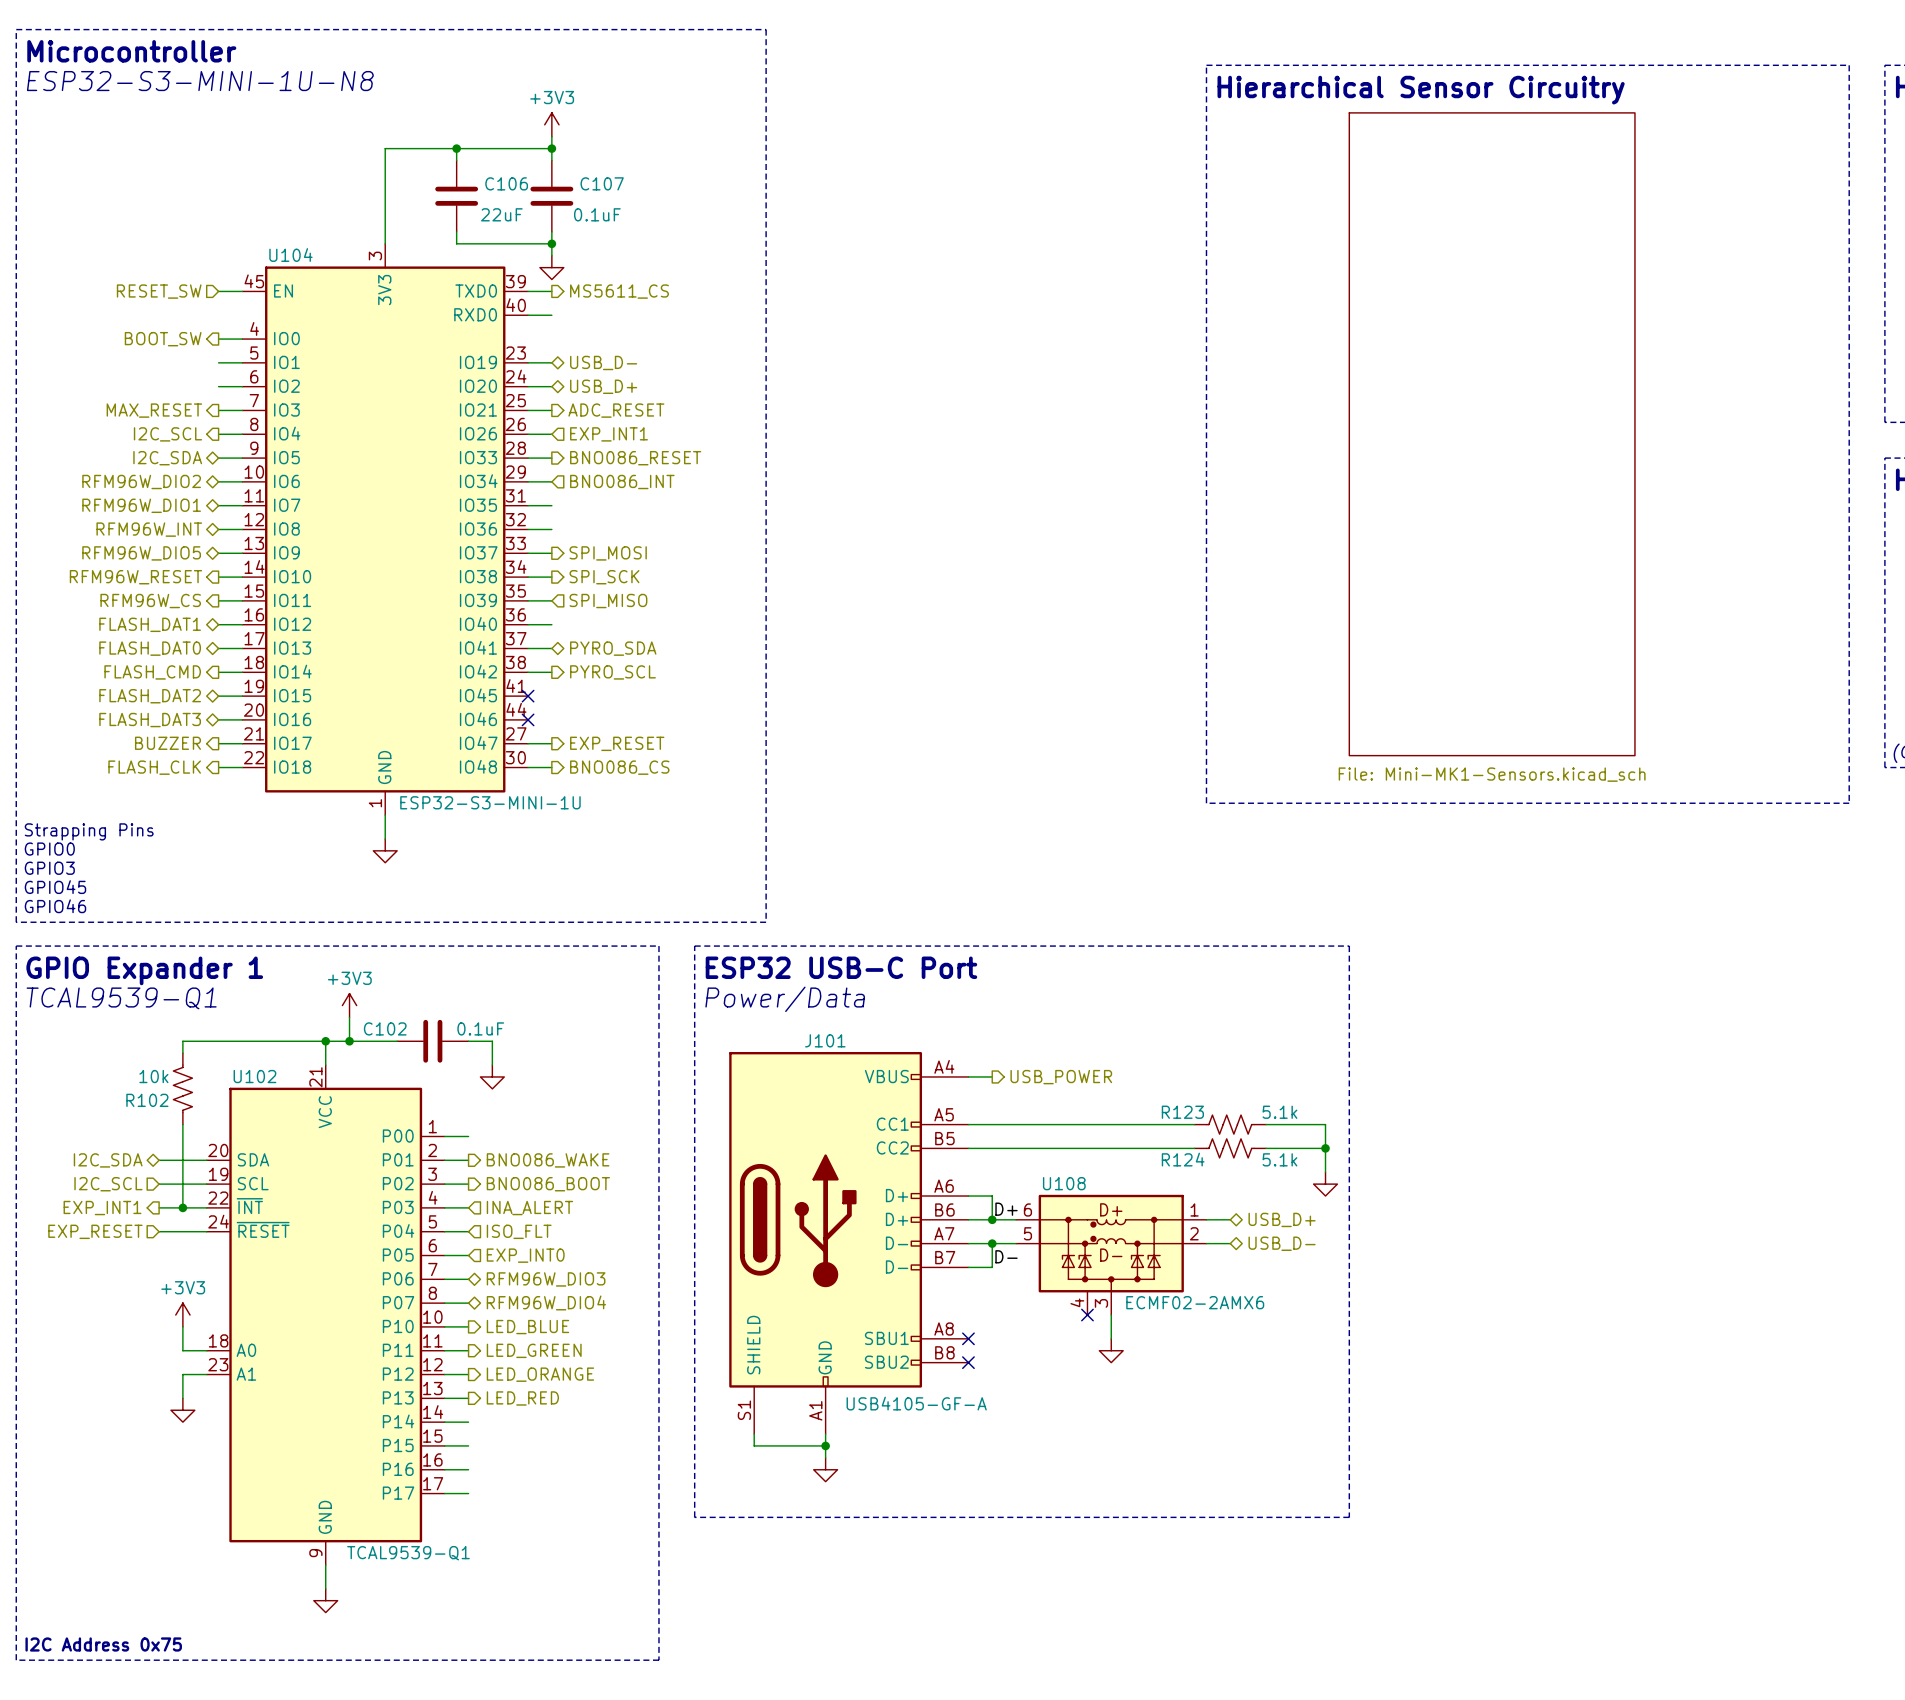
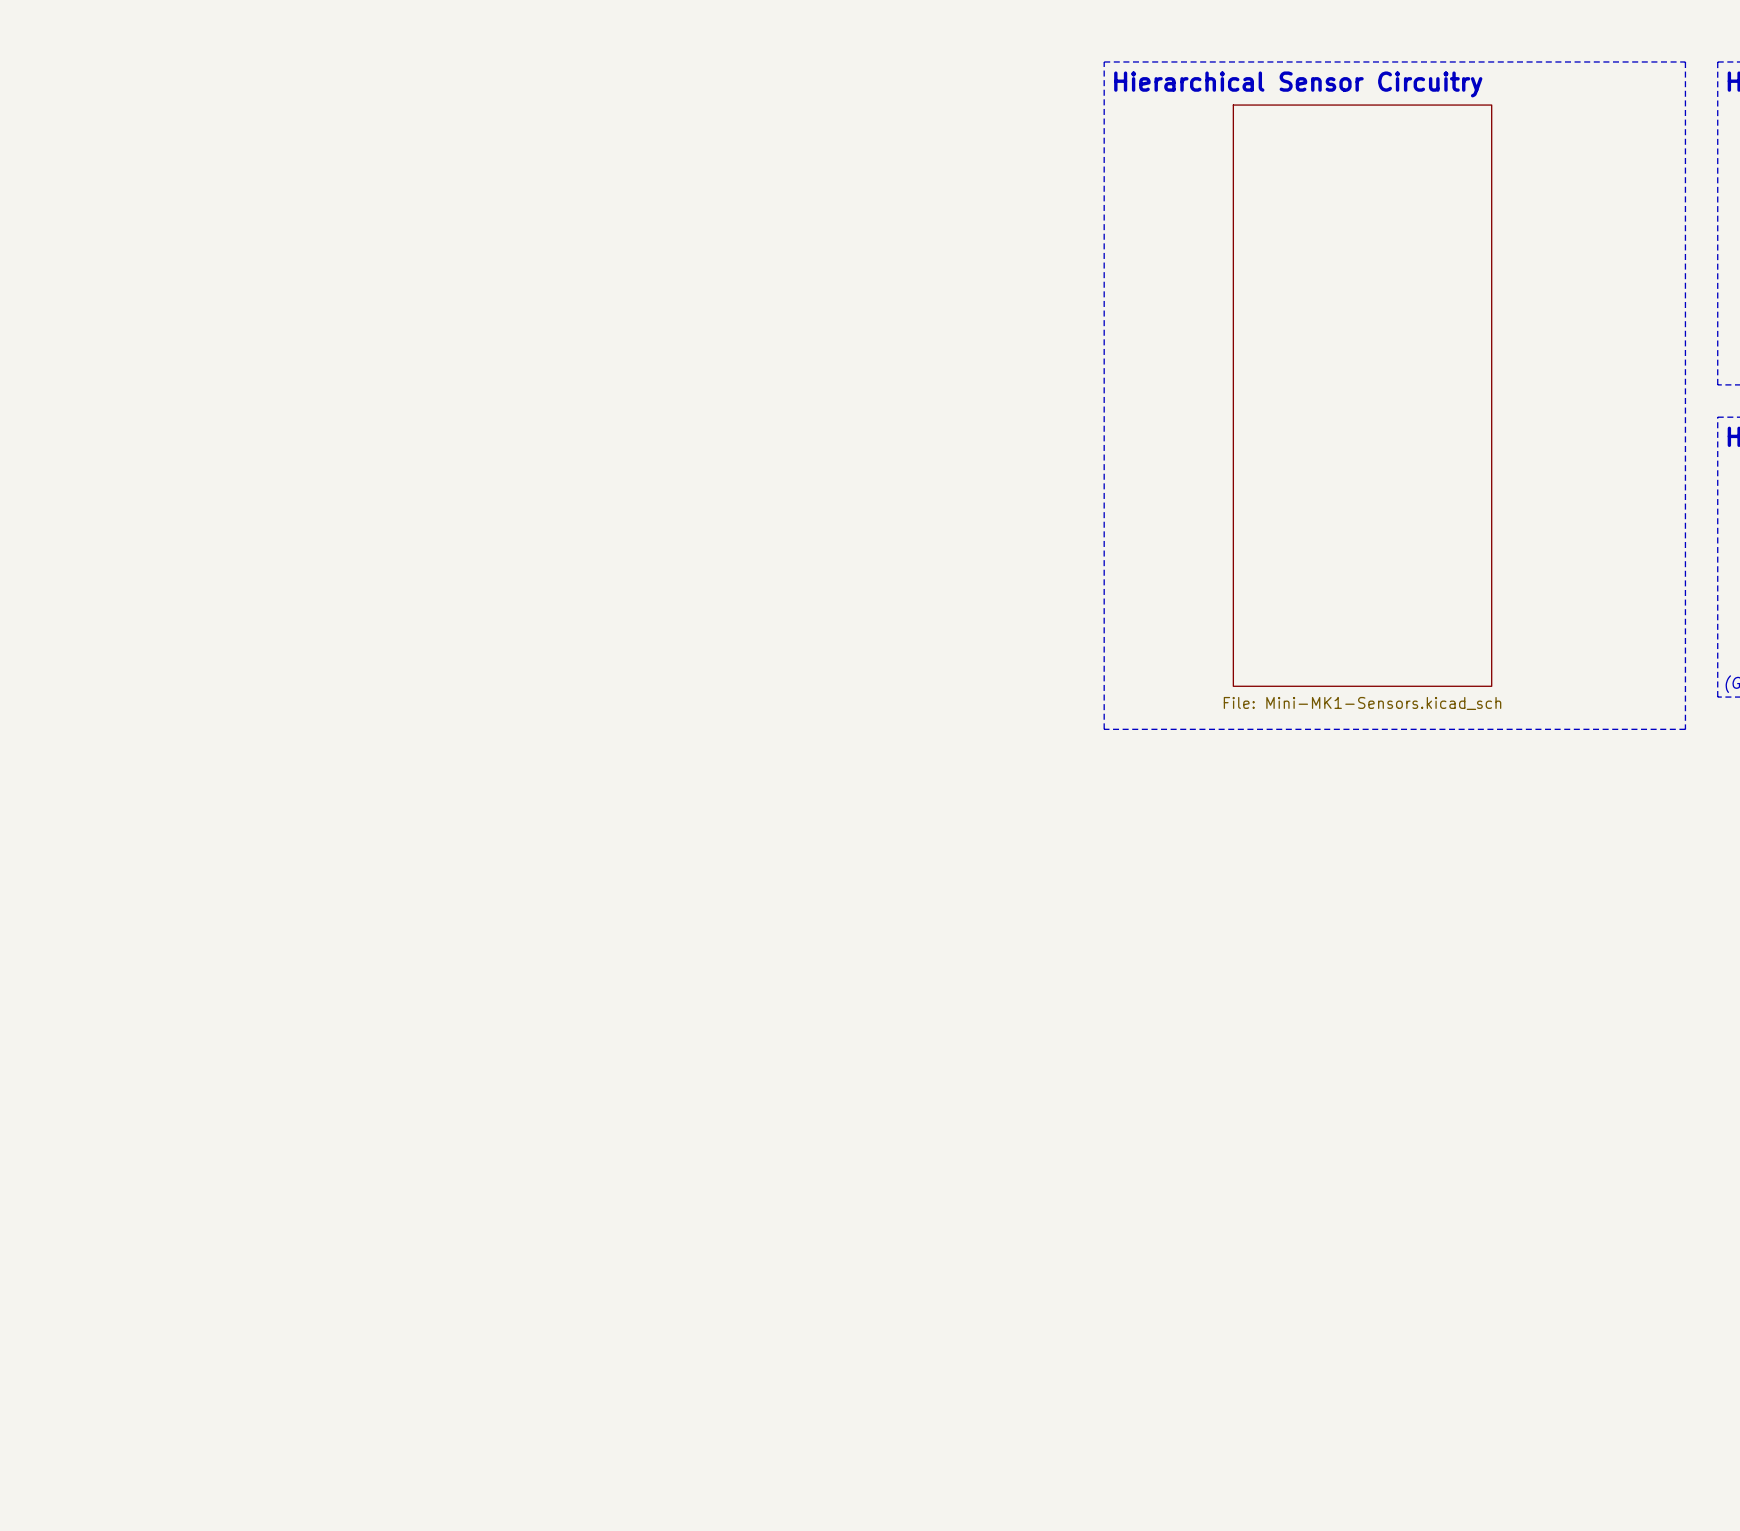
line: (16, 29) (766, 29) (766, 922) (16, 922) (16, 29) -> none
text: Microcontroller (131, 51) -> none
text: ESP32-S3-MINI-1U-N8 (200, 81) -> none
power symbol: +3V3 (551, 124) -> none
wire: (551, 136) (551, 160) -> none
wire: (456, 148) (456, 160) -> none
junction: (456, 148) -> none
wire: (551, 148) (385, 148) (385, 243) -> none
junction: (551, 148) -> none
C106: 22uF (456, 196) -> none
C107: 0.1uF (551, 196) -> none
wire: (456, 231) (456, 243) (551, 243) -> none
wire: (551, 231) (551, 255) -> none
junction: (551, 243) -> none
power symbol: (551, 267) -> none
hierarchical label: RESET_SW (159, 291) -> none
wire: (218, 291) (242, 291) -> none
wire: (528, 291) (551, 291) -> none
hierarchical label: MS5611_CS (619, 291) -> none
wire: (528, 315) (551, 315) -> none
hierarchical label: BOOT_SW (163, 339) -> none
wire: (218, 339) (242, 339) -> none
wire: (218, 362) (242, 362) -> none
wire: (528, 362) (551, 362) -> none
hierarchical label: USB_D- (603, 362) -> none
wire: (218, 386) (242, 386) -> none
wire: (528, 386) (551, 386) -> none
hierarchical label: USB_D+ (603, 386) -> none
hierarchical label: MAX_RESET (154, 410) -> none
wire: (218, 410) (242, 410) -> none
wire: (528, 410) (551, 410) -> none
hierarchical label: ADC_RESET (616, 410) -> none
hierarchical label: I2C_SCL (167, 434) -> none
wire: (218, 434) (242, 434) -> none
wire: (528, 434) (551, 434) -> none
hierarchical label: EXP_INT1 (609, 434) -> none
hierarchical label: I2C_SDA (167, 458) -> none
wire: (218, 458) (242, 458) -> none
wire: (528, 458) (551, 458) -> none
hierarchical label: BNO086_RESET (635, 458) -> none
wire: (218, 481) (242, 481) -> none
wire: (528, 481) (551, 481) -> none
hierarchical label: RFM96W_DIO2 (141, 482) -> none
hierarchical label: BNO086_INT (622, 482) -> none
hierarchical label: RFM96W_DIO1 (141, 505) -> none
wire: (218, 505) (242, 505) -> none
wire: (528, 505) (551, 505) -> none
hierarchical label: RFM96W_INT (149, 529) -> none
wire: (218, 529) (242, 529) -> none
U104: ESP32-S3-MINI-1U (385, 529) -> none
wire: (528, 529) (551, 529) -> none
hierarchical label: RFM96W_DIO5 (141, 553) -> none
wire: (218, 553) (242, 553) -> none
wire: (528, 553) (551, 553) -> none
hierarchical label: SPI_MOSI (608, 553) -> none
hierarchical label: RFM96W_RESET (135, 577) -> none
wire: (218, 577) (242, 577) -> none
wire: (528, 577) (551, 577) -> none
hierarchical label: SPI_SCK (604, 577) -> none
wire: (218, 600) (242, 600) -> none
wire: (528, 600) (551, 600) -> none
hierarchical label: RFM96W_CS (150, 601) -> none
hierarchical label: SPI_MISO (608, 601) -> none
hierarchical label: FLASH_DAT1 (150, 624) -> none
wire: (218, 624) (242, 624) -> none
wire: (528, 624) (551, 624) -> none
hierarchical label: FLASH_DAT0 (150, 648) -> none
wire: (218, 648) (242, 648) -> none
wire: (528, 648) (551, 648) -> none
hierarchical label: PYRO_SDA (613, 648) -> none
hierarchical label: FLASH_CMD (152, 672) -> none
wire: (218, 672) (242, 672) -> none
wire: (528, 672) (551, 672) -> none
hierarchical label: PYRO_SCL (612, 672) -> none
hierarchical label: FLASH_DAT2 (150, 696) -> none
wire: (218, 696) (242, 696) -> none
no-connect mark: (528, 696) -> none
wire: (218, 719) (242, 719) -> none
no-connect mark: (528, 719) -> none
hierarchical label: FLASH_DAT3 (150, 720) -> none
hierarchical label: BUZZER (167, 743) -> none
wire: (218, 743) (242, 743) -> none
wire: (528, 743) (551, 743) -> none
hierarchical label: EXP_RESET (617, 743) -> none
hierarchical label: FLASH_CLK (154, 767) -> none
wire: (218, 767) (242, 767) -> none
wire: (528, 767) (551, 767) -> none
hierarchical label: BNO086_CS (619, 767) -> none
wire: (385, 815) (385, 838) -> none
text: Strapping Pins (89, 831) -> none
text: GPIO0 (49, 849) -> none
power symbol: (385, 850) -> none
text: GPIO3 (49, 868) -> none
text: GPIO45 (55, 887) -> none
text: GPIO46 (55, 906) -> none
line: (16, 946) (16, 1660) (658, 1660) (658, 946) (16, 946) -> none
line: (694, 946) (1349, 946) (1349, 1517) (694, 1517) (694, 946) -> none
text: ESP32 USB-C Port (841, 967) -> none
text: GPIO Expander 1 (144, 970) -> none
text: TCAL9539-Q1 (121, 998) -> none
text: Power/Data (785, 999) -> none
power symbol: +3V3 (349, 1005) -> none
wire: (349, 1017) (349, 1041) -> none
wire: (325, 1041) (325, 1065) -> none
junction: (325, 1041) -> none
junction: (349, 1041) -> none
wire: (397, 1041) (182, 1041) (182, 1053) -> none
C102: 0.1uF (432, 1041) -> none
wire: (468, 1041) (492, 1041) (492, 1065) -> none
power symbol: (492, 1076) -> none
wire: (968, 1076) (992, 1076) -> none
hierarchical label: USB_POWER (1061, 1077) -> none
R102: 10k (182, 1088) -> none
wire: (182, 1124) (182, 1207) -> none
wire: (968, 1124) (1194, 1124) -> none
R123: 5.1k (1230, 1124) -> none
wire: (1265, 1124) (1325, 1124) (1325, 1172) -> none
wire: (444, 1136) (468, 1136) -> none
wire: (968, 1148) (1194, 1148) -> none
R124: 5.1k (1230, 1148) -> none
wire: (1265, 1148) (1325, 1148) -> none
junction: (1325, 1148) -> none
hierarchical label: I2C_SDA (108, 1160) -> none
wire: (159, 1160) (206, 1160) -> none
wire: (444, 1160) (468, 1160) -> none
hierarchical label: BNO086_WAKE (548, 1160) -> none
hierarchical label: I2C_SCL (108, 1184) -> none
wire: (159, 1184) (206, 1184) -> none
wire: (444, 1184) (468, 1184) -> none
hierarchical label: BNO086_BOOT (548, 1184) -> none
power symbol: (1325, 1184) -> none
wire: (968, 1196) (992, 1196) (992, 1219) -> none
wire: (159, 1207) (206, 1207) -> none
junction: (182, 1207) -> none
wire: (444, 1207) (468, 1207) -> none
hierarchical label: EXP_INT1 (102, 1208) -> none
hierarchical label: INA_ALERT (529, 1208) -> none
label: D+ (1006, 1209) -> none
wire: (968, 1219) (1016, 1219) -> none
junction: (992, 1219) -> none
wire: (1206, 1219) (1230, 1219) -> none
hierarchical label: USB_D+ (1282, 1219) -> none
hierarchical label: EXP_RESET (95, 1231) -> none
wire: (159, 1231) (206, 1231) -> none
wire: (444, 1231) (468, 1231) -> none
hierarchical label: ISO_FLT (519, 1231) -> none
J101: USB4105-GF-A (848, 1243) -> none
wire: (968, 1243) (1016, 1243) -> none
wire: (992, 1243) (992, 1267) (968, 1267) -> none
junction: (992, 1243) -> none
wire: (1206, 1243) (1230, 1243) -> none
hierarchical label: USB_D- (1282, 1243) -> none
U108: ECMF02-2AMX6 (1111, 1254) -> none
wire: (444, 1255) (468, 1255) -> none
hierarchical label: EXP_INT0 (525, 1255) -> none
label: D- (1006, 1256) -> none
wire: (444, 1279) (468, 1279) -> none
hierarchical label: RFM96W_DIO3 (546, 1279) -> none
hierarchical label: RFM96W_DIO4 (546, 1302) -> none
wire: (444, 1303) (468, 1303) -> none
power symbol: +3V3 (182, 1315) -> none
U102: TCAL9539-Q1 (325, 1315) -> none
no-connect mark: (1087, 1315) -> none
wire: (1111, 1315) (1111, 1338) -> none
wire: (182, 1326) (182, 1350) (206, 1350) -> none
wire: (444, 1326) (468, 1326) -> none
hierarchical label: LED_BLUE (527, 1327) -> none
no-connect mark: (968, 1338) -> none
wire: (444, 1350) (468, 1350) -> none
hierarchical label: LED_GREEN (534, 1350) -> none
power symbol: (1111, 1350) -> none
no-connect mark: (968, 1362) -> none
wire: (206, 1374) (182, 1374) (182, 1398) -> none
wire: (444, 1374) (468, 1374) -> none
hierarchical label: LED_ORANGE (540, 1374) -> none
wire: (444, 1398) (468, 1398) -> none
hierarchical label: LED_RED (522, 1398) -> none
power symbol: (182, 1410) -> none
wire: (444, 1422) (468, 1422) -> none
wire: (754, 1434) (754, 1445) (825, 1445) -> none
wire: (825, 1434) (825, 1457) -> none
wire: (444, 1445) (468, 1445) -> none
junction: (825, 1445) -> none
wire: (444, 1469) (468, 1469) -> none
power symbol: (825, 1469) -> none
wire: (444, 1493) (468, 1493) -> none
wire: (325, 1564) (325, 1588) -> none
power symbol: (325, 1600) -> none
text: I2C Address 0x75 (103, 1644) -> none

